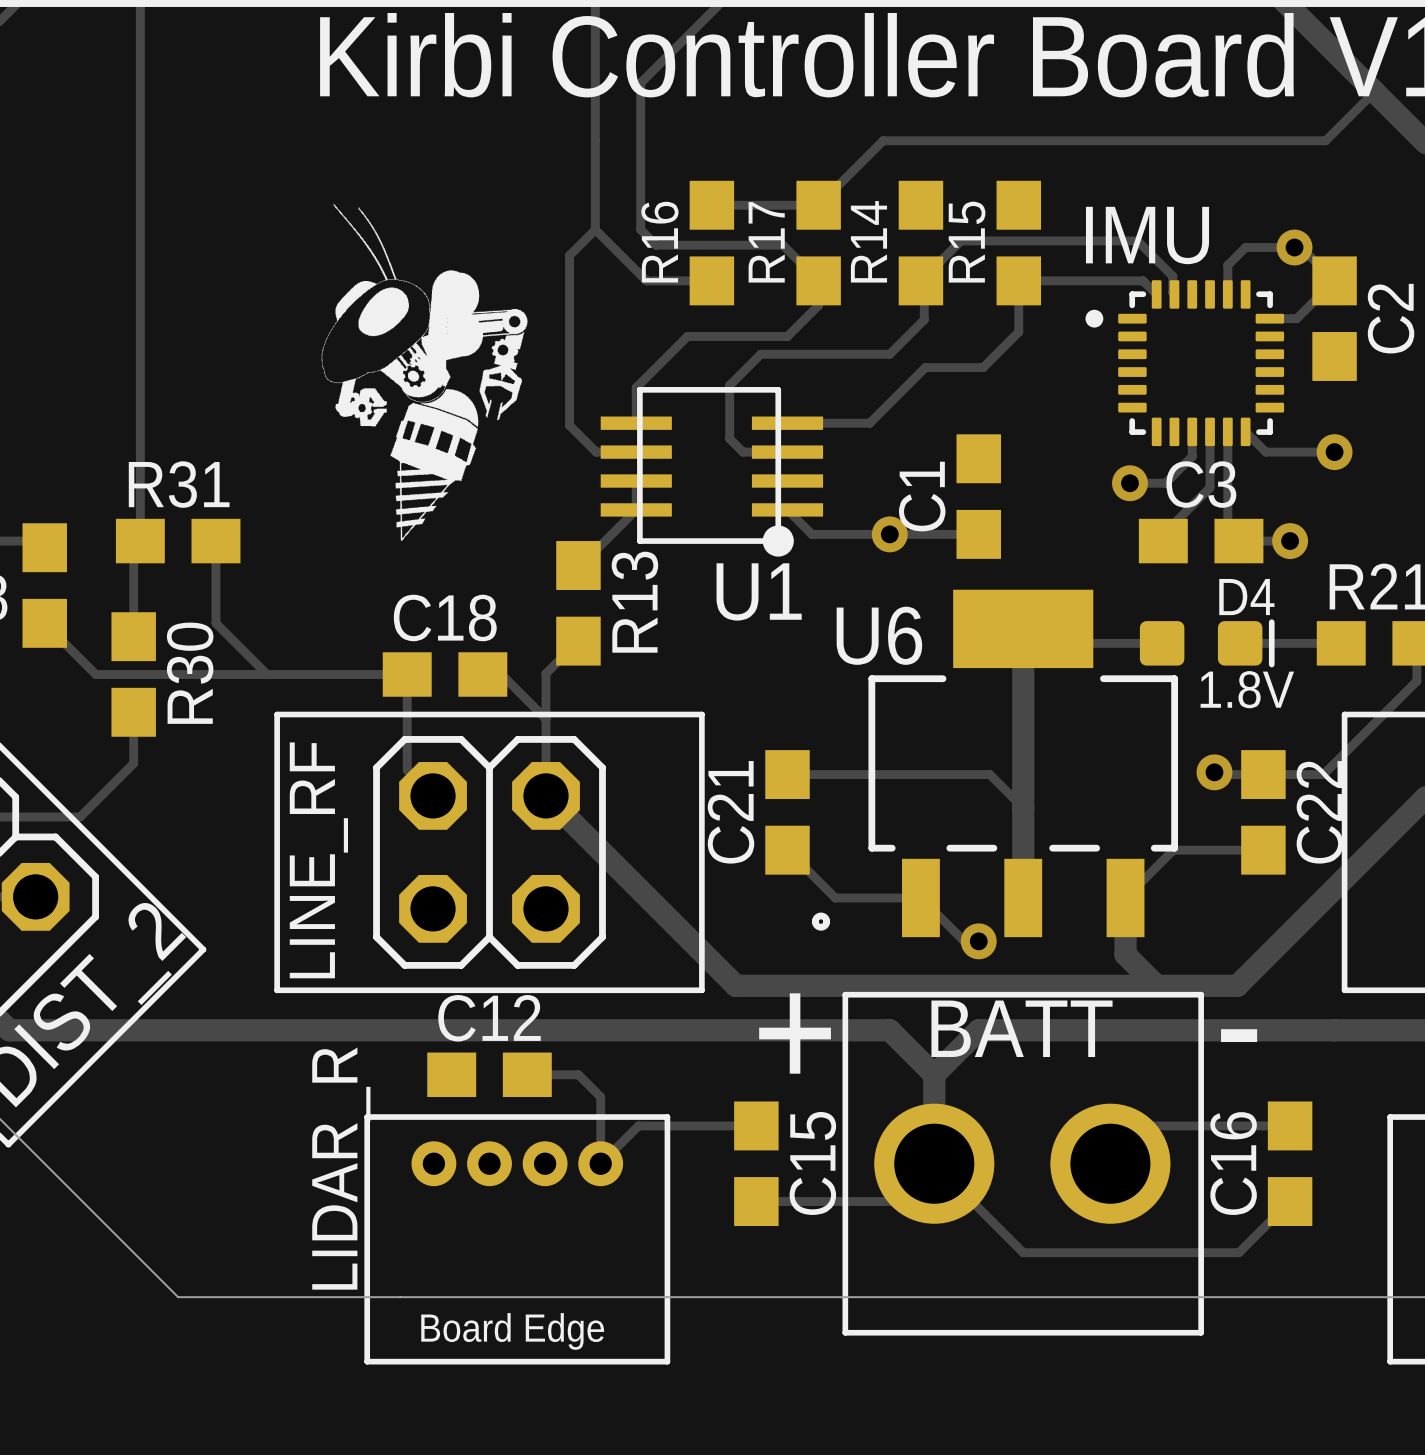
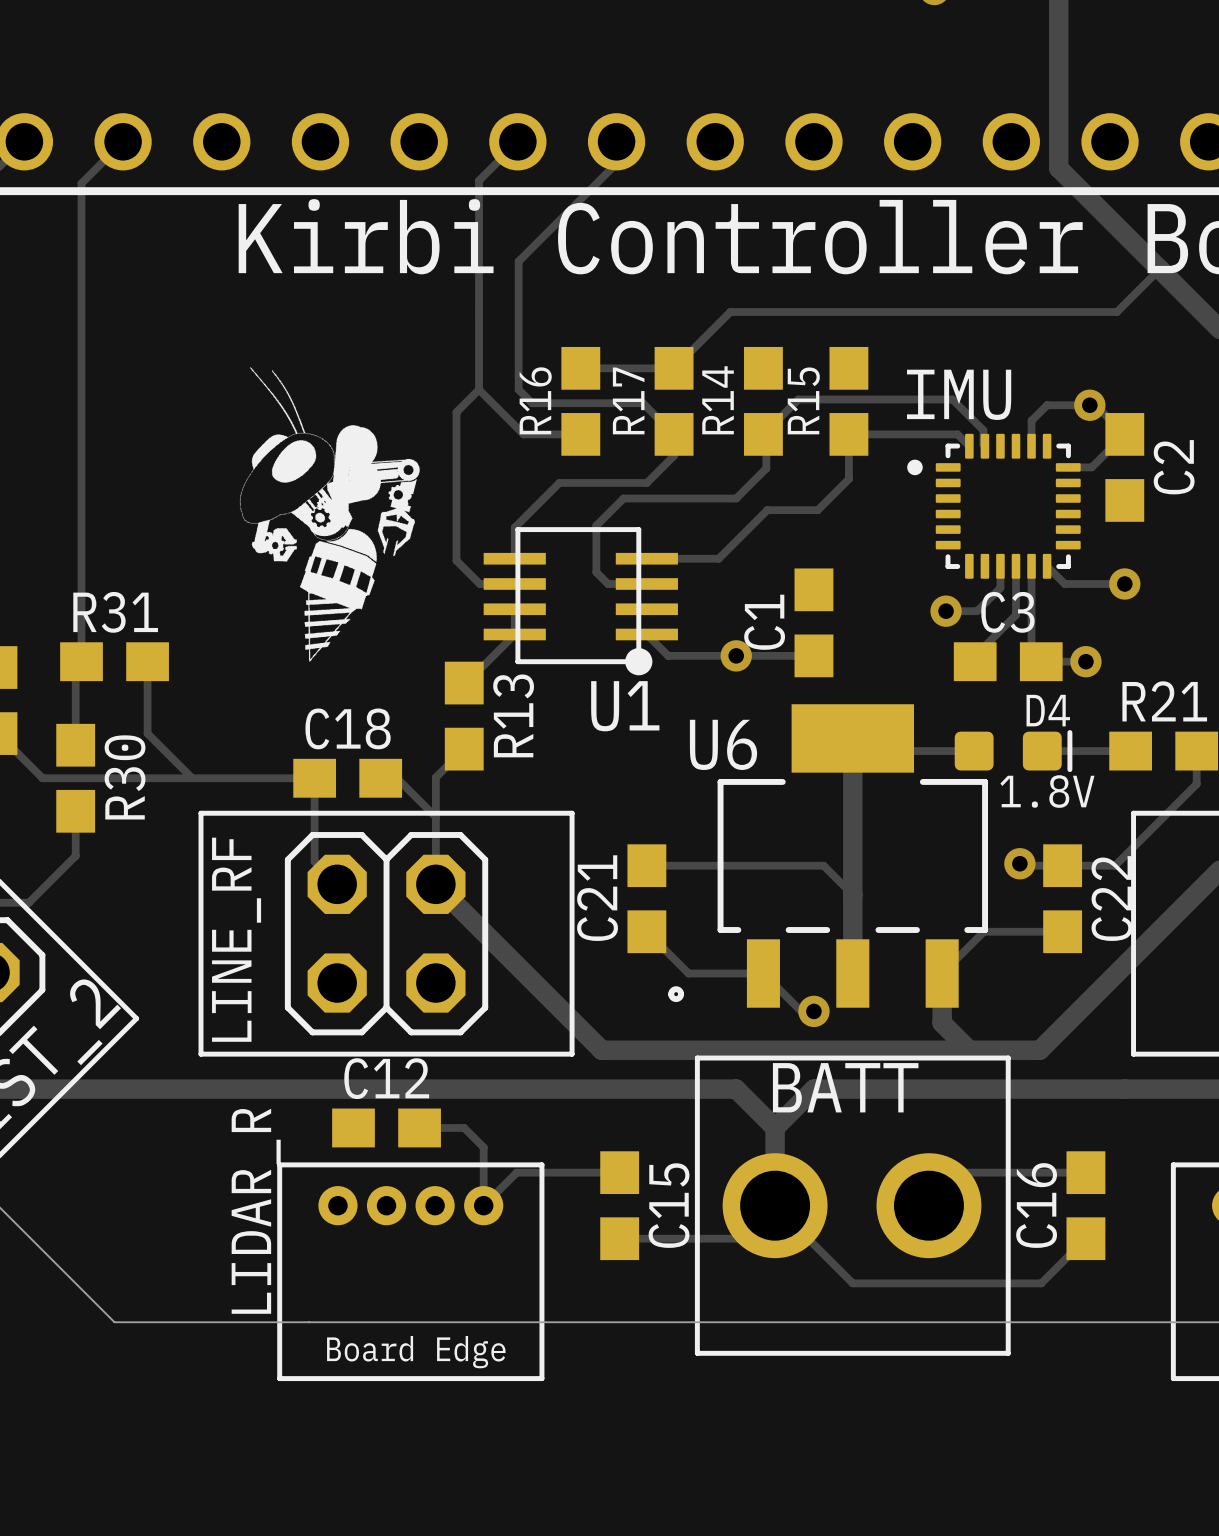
text: + (795, 1033) -> none
text: - (1239, 1035) -> none

